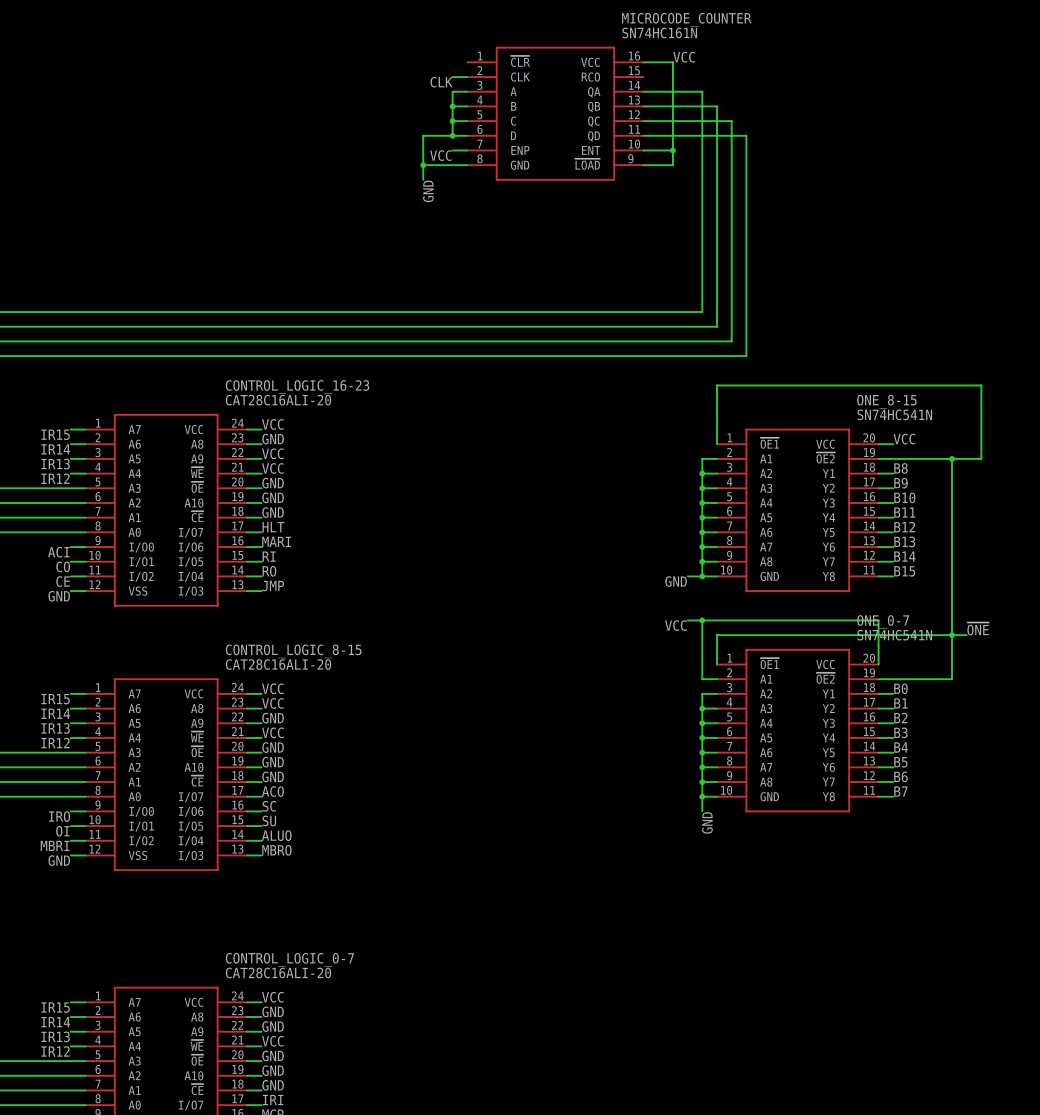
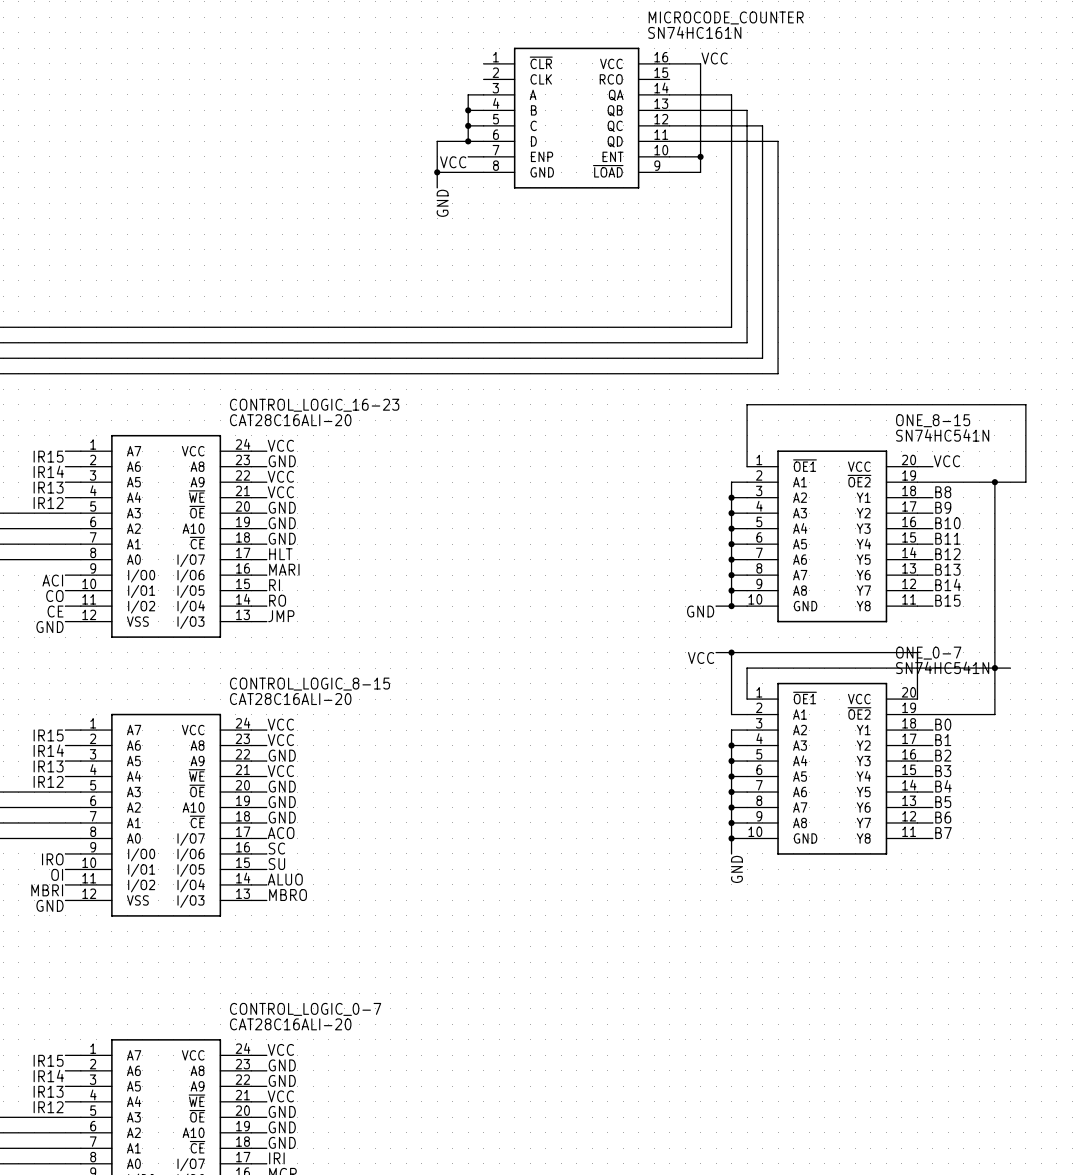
wire: (452, 77) (467, 77) -> none
label: CLK (441, 82) -> none
label: ~{ONE} (978, 628) -> none

